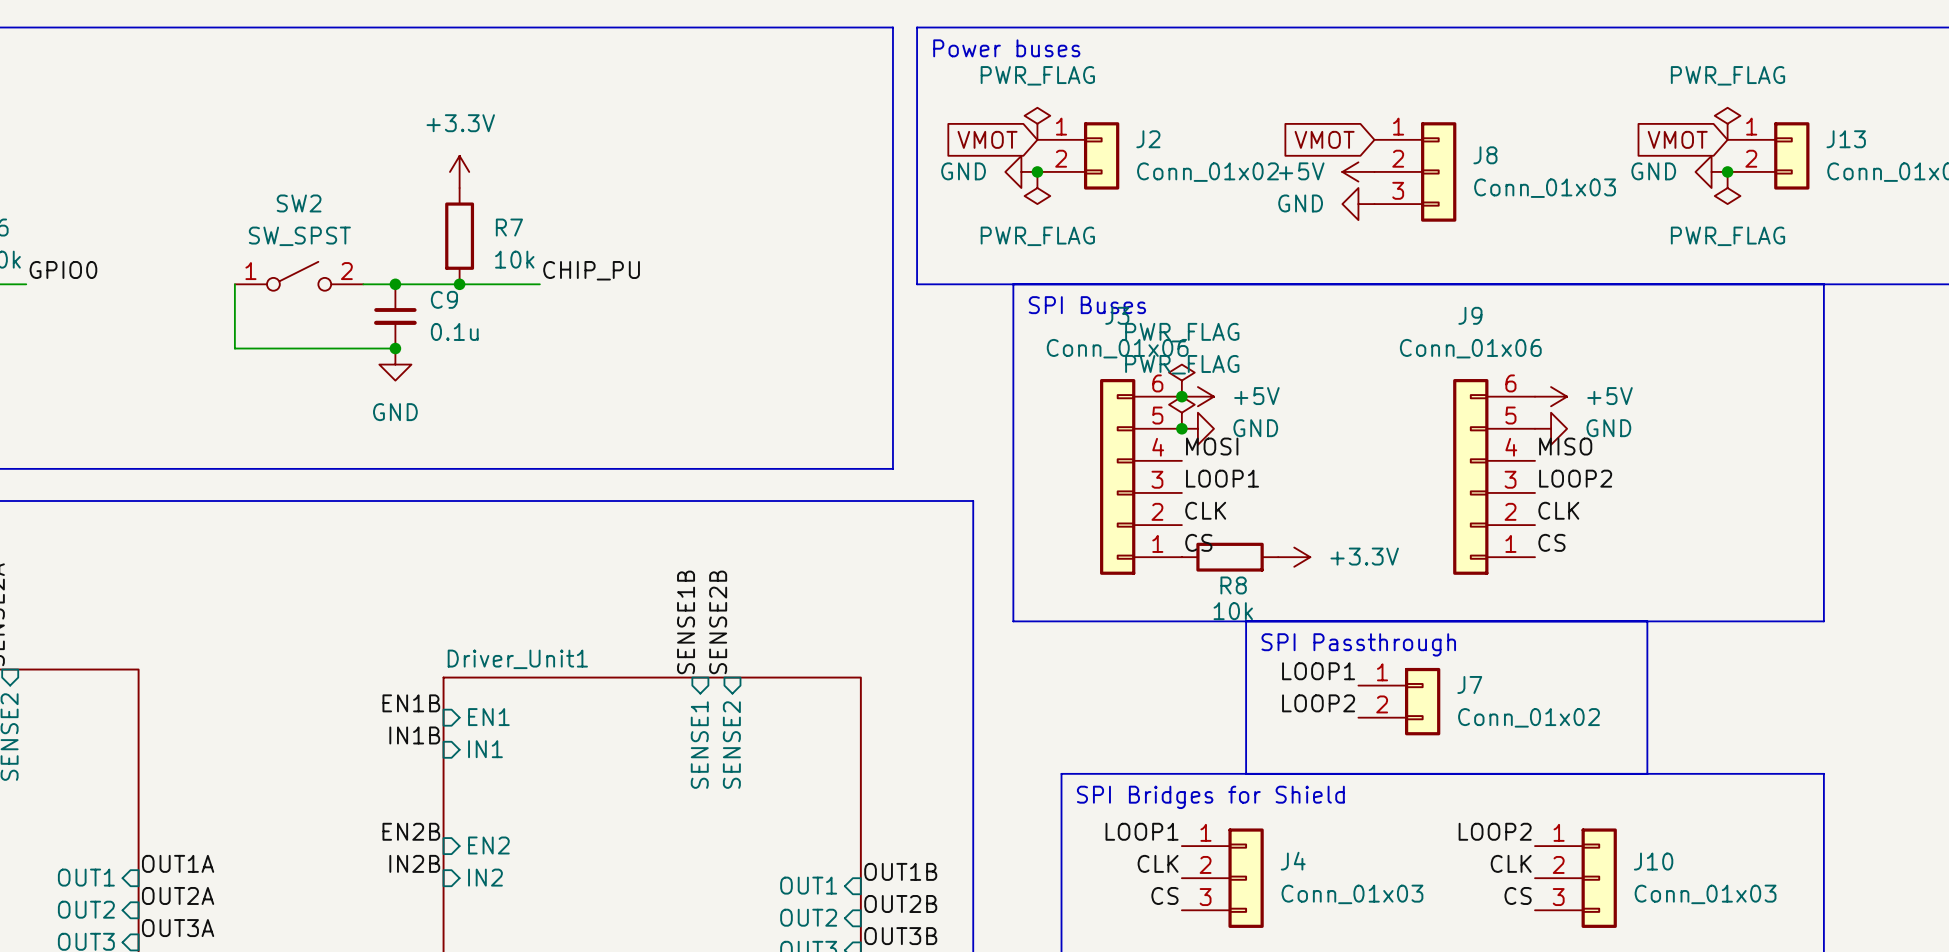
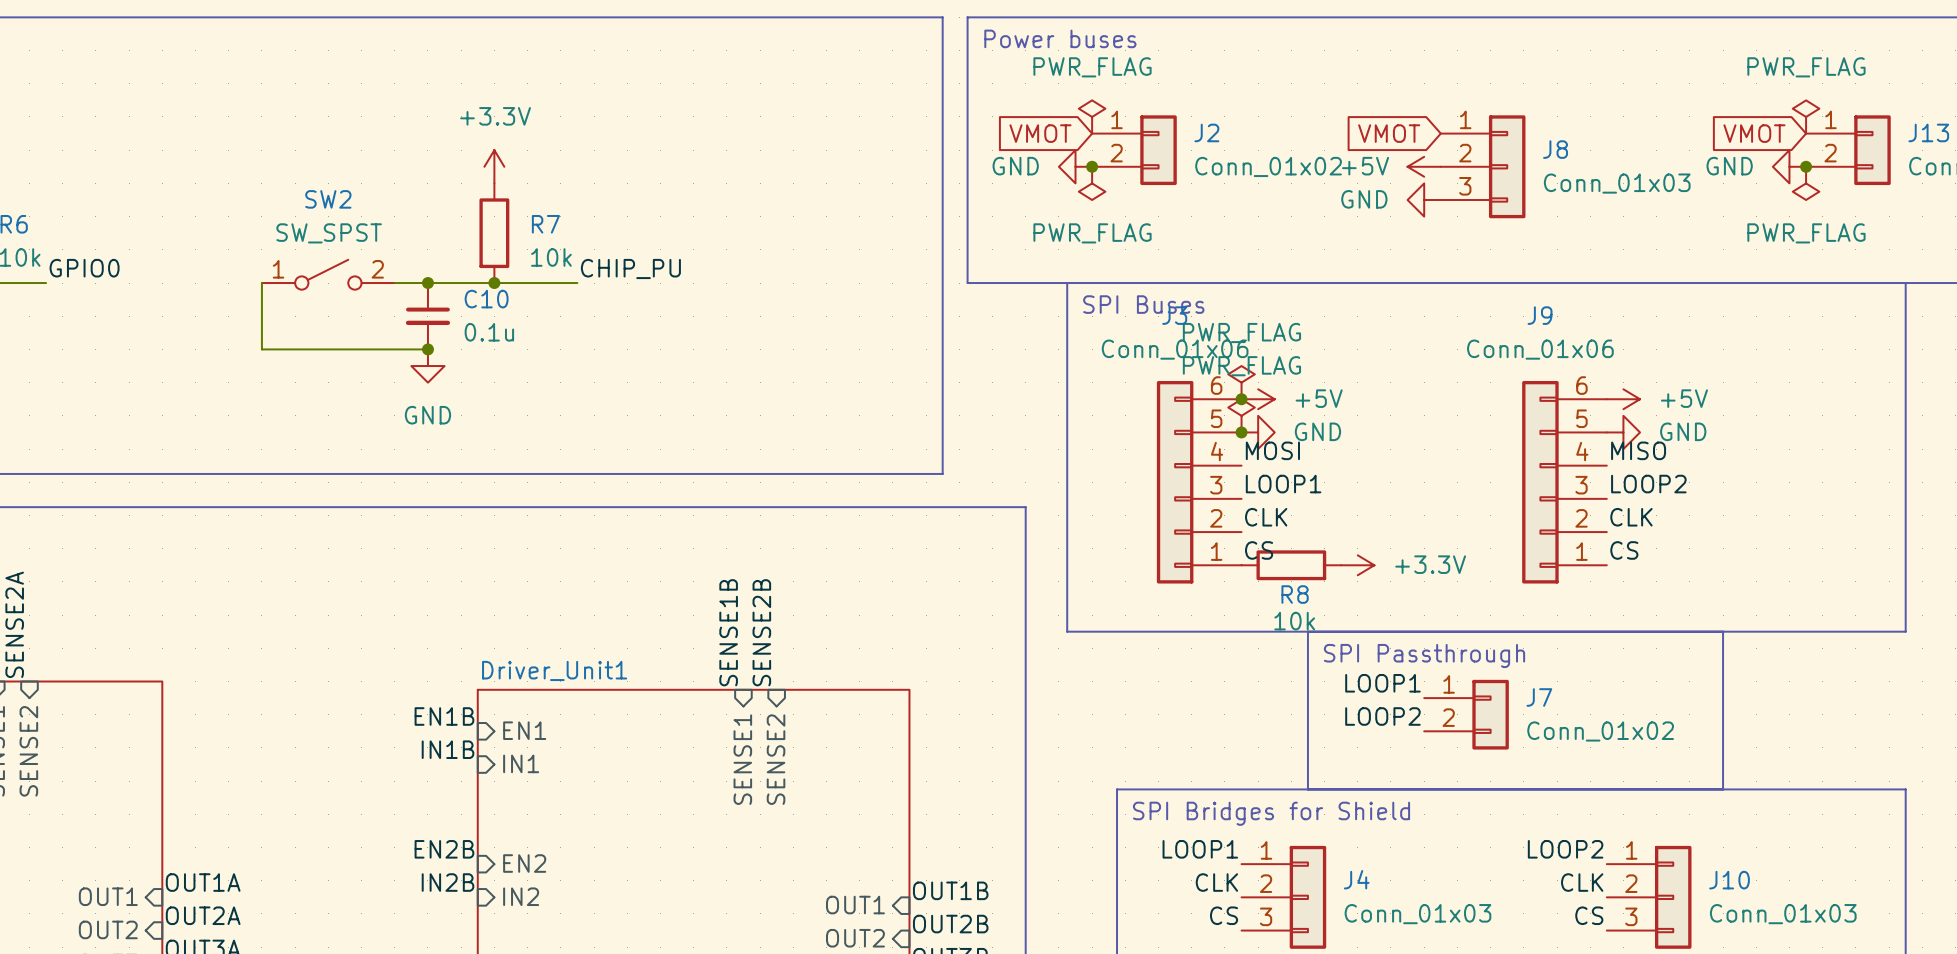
C9 name: C9 (444, 299) -> C10 (486, 299)

